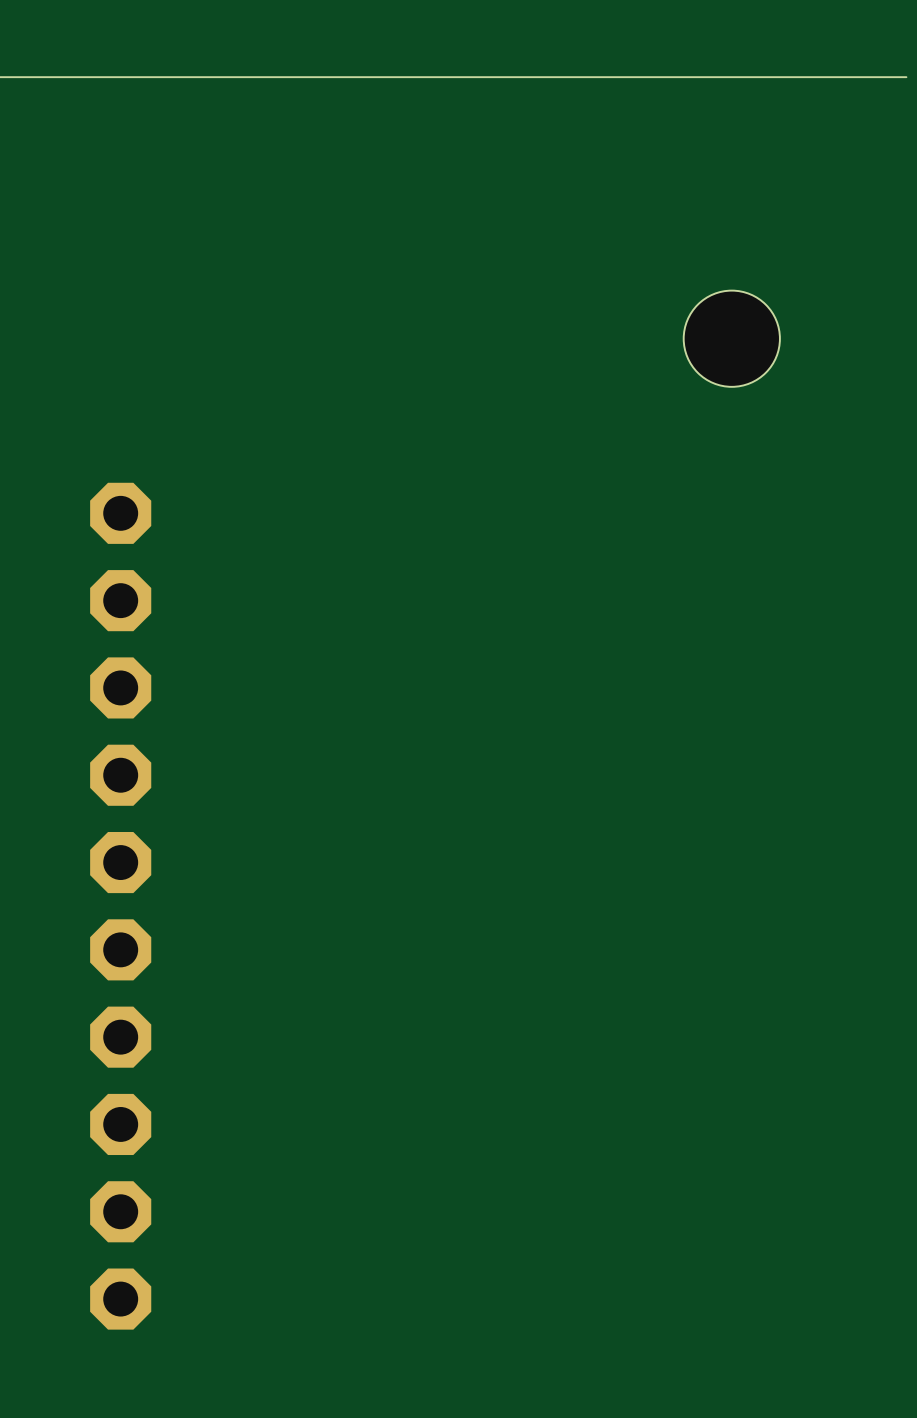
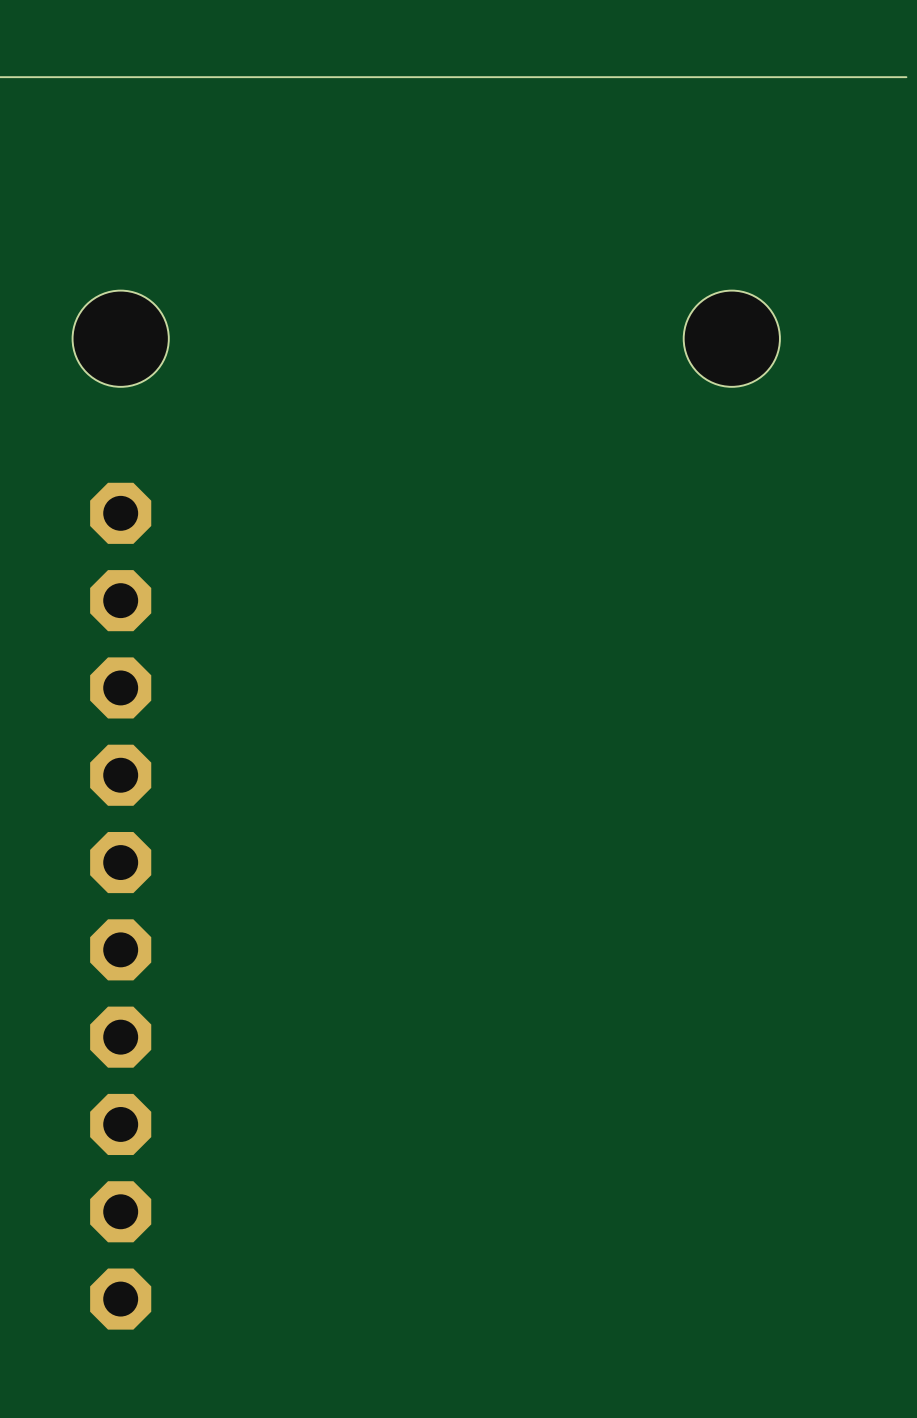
part: none -> (120, 338)

